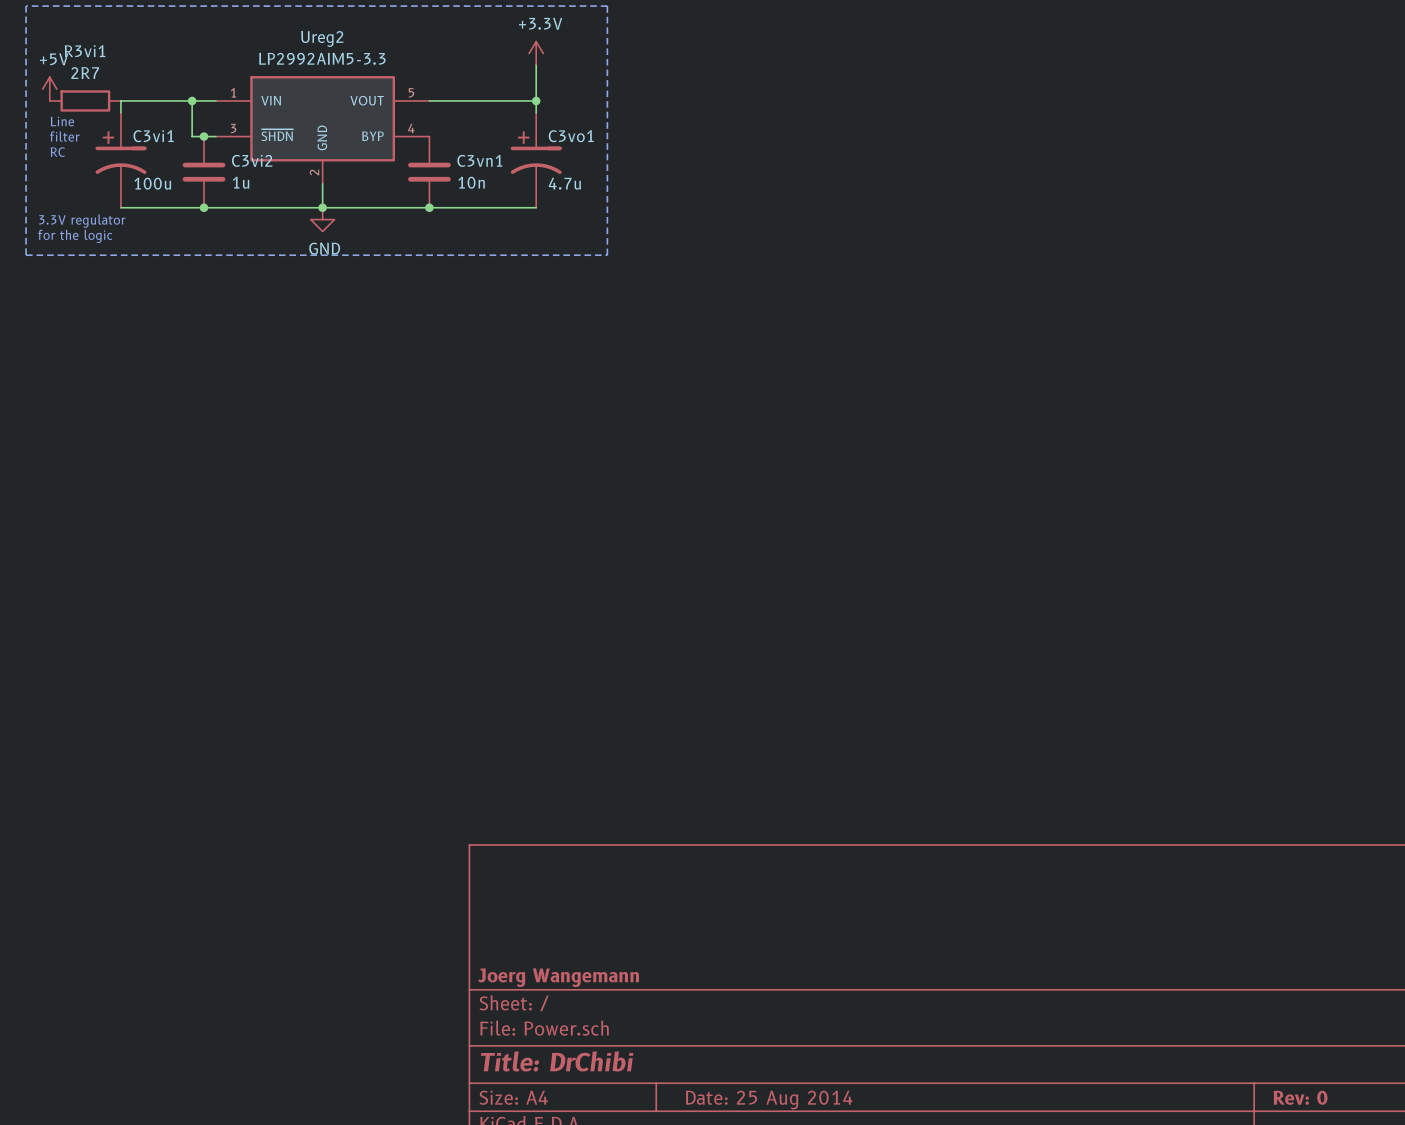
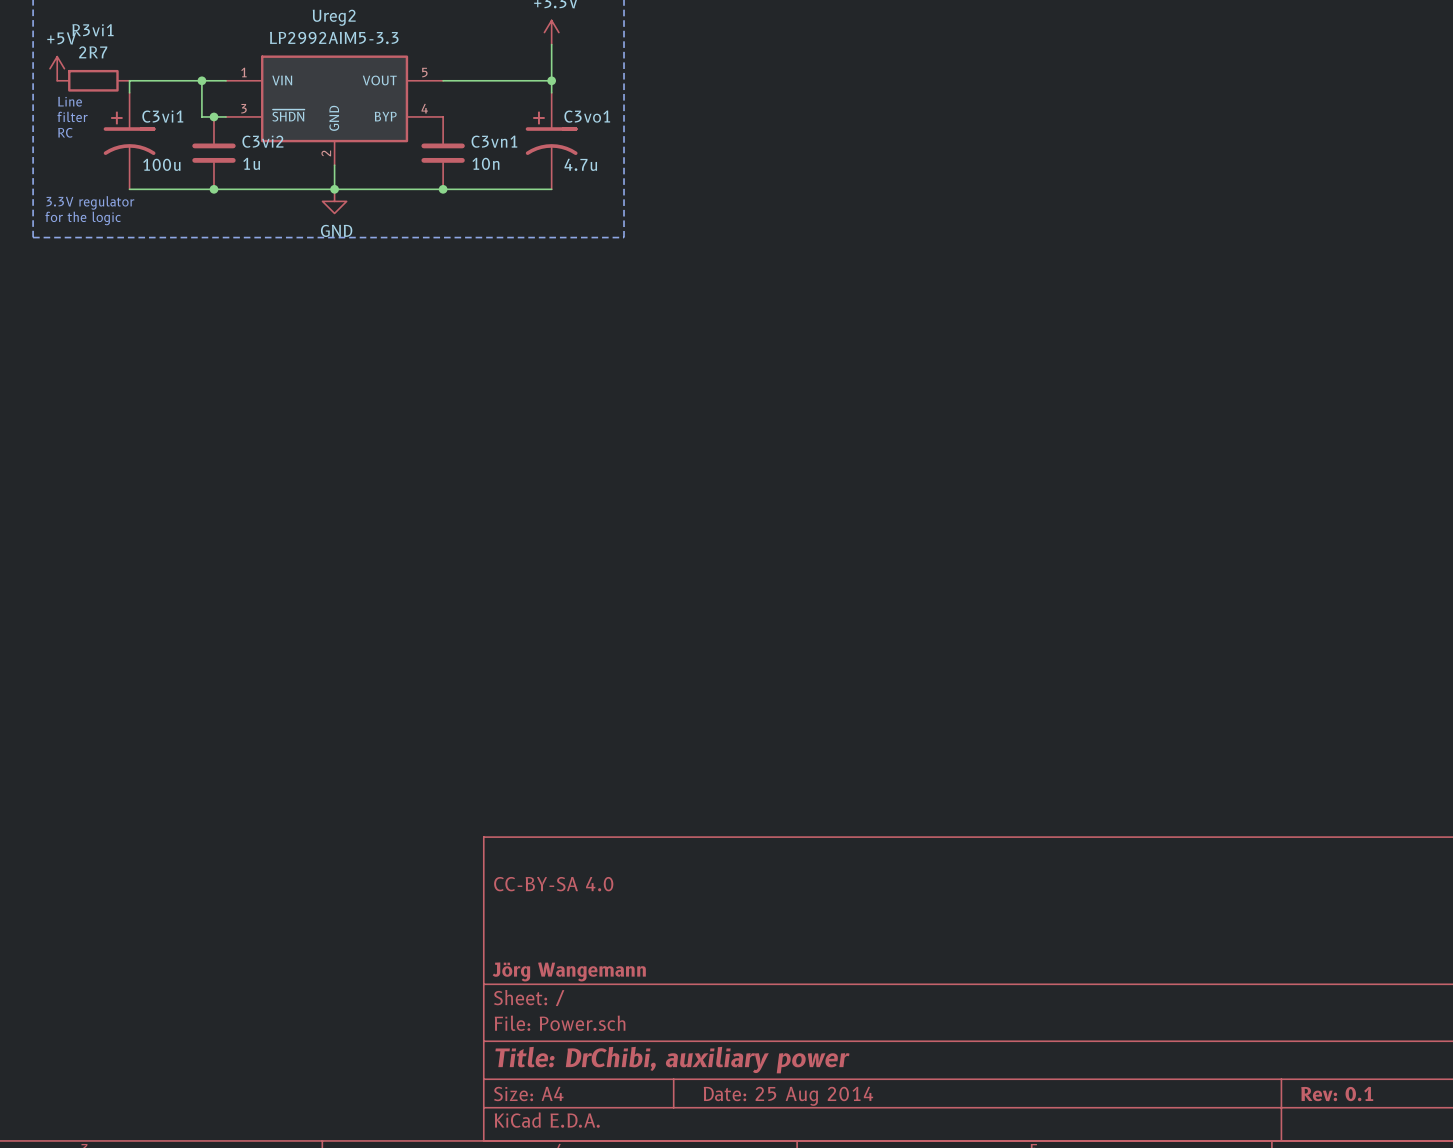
title block: none -> CC-BY-SA 4.0 (553, 884)
title block: Joerg Wangemann (558, 977) -> Jörg Wangemann (569, 971)
title block: Title: DrChibi (557, 1061) -> Title: DrChibi, auxiliary power (672, 1060)
title block: Rev: 0 (1300, 1097) -> Rev: 0.1 (1337, 1094)

